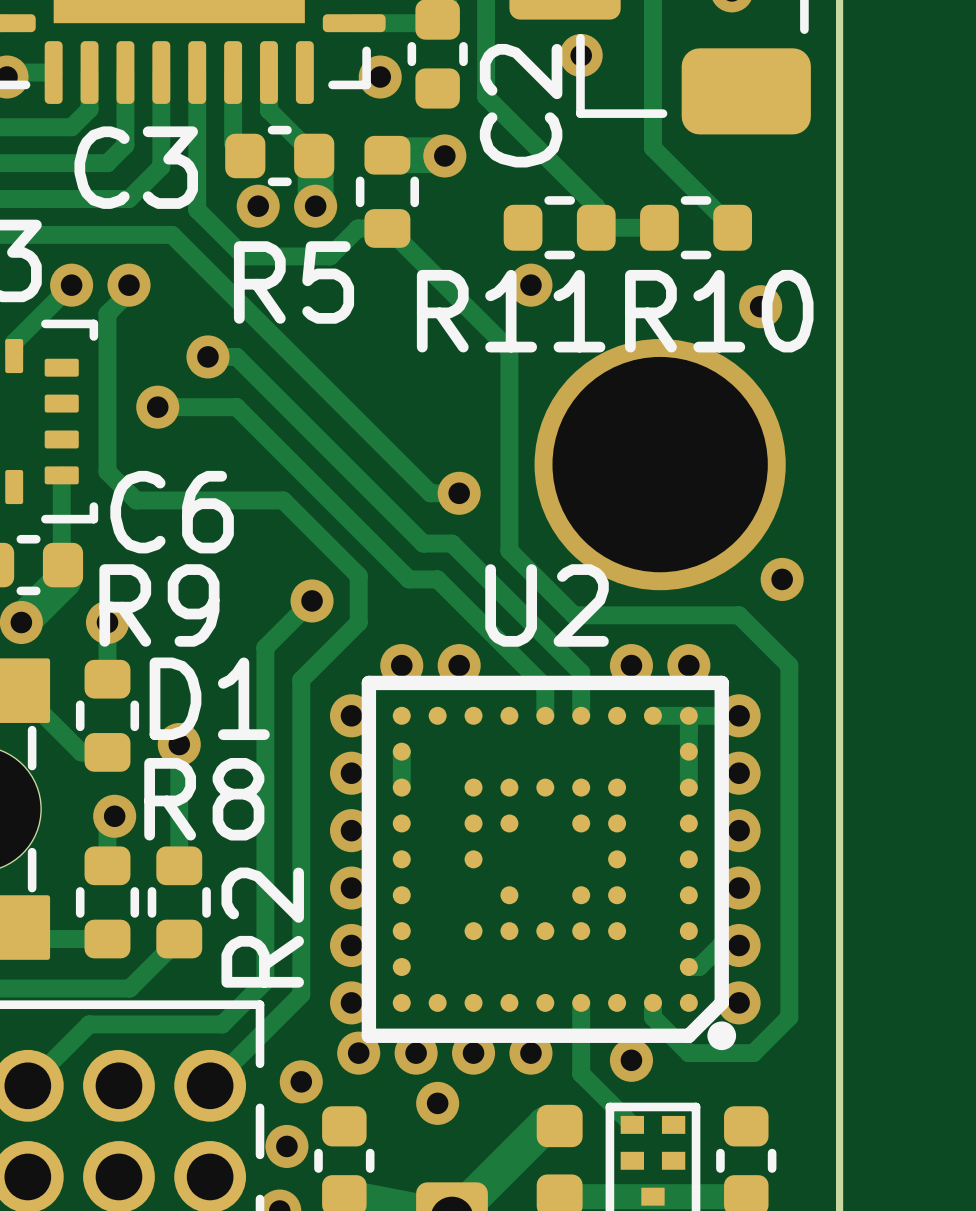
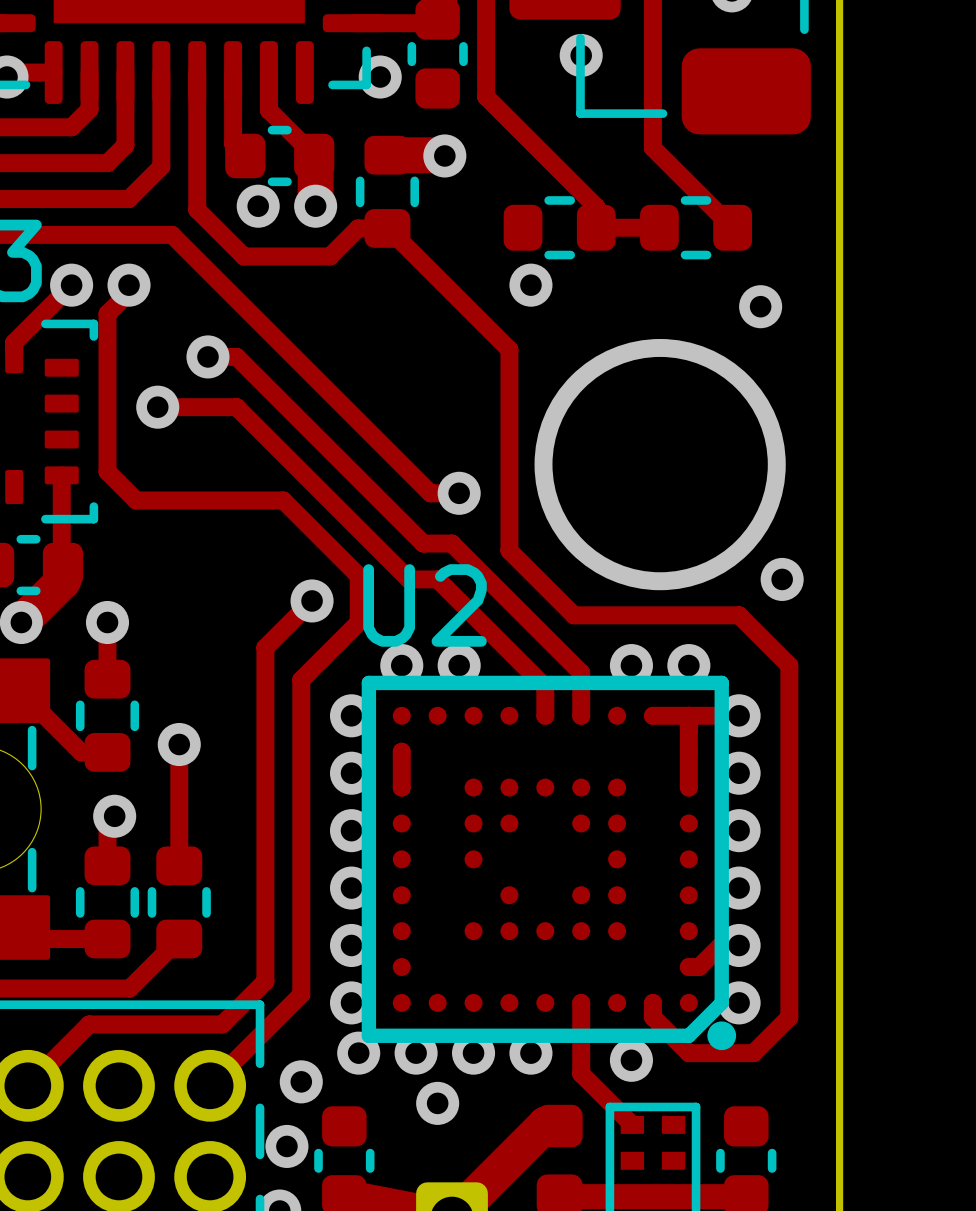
C2 name: C2 (521, 105) -> none
C3 name: C3 (136, 167) -> none
R5 name: R5 (294, 282) -> none
R11 name: R11 (511, 311) -> none
R10 name: R10 (719, 311) -> none
C6 name: C6 (172, 512) -> none
R9 name: R9 (159, 605) -> none
U2 name position: U2 (547, 605) -> U2 (425, 605)
D1 name: D1 (209, 698) -> none
R8 name: R8 (204, 799) -> none
R2 name: R2 (262, 927) -> none

